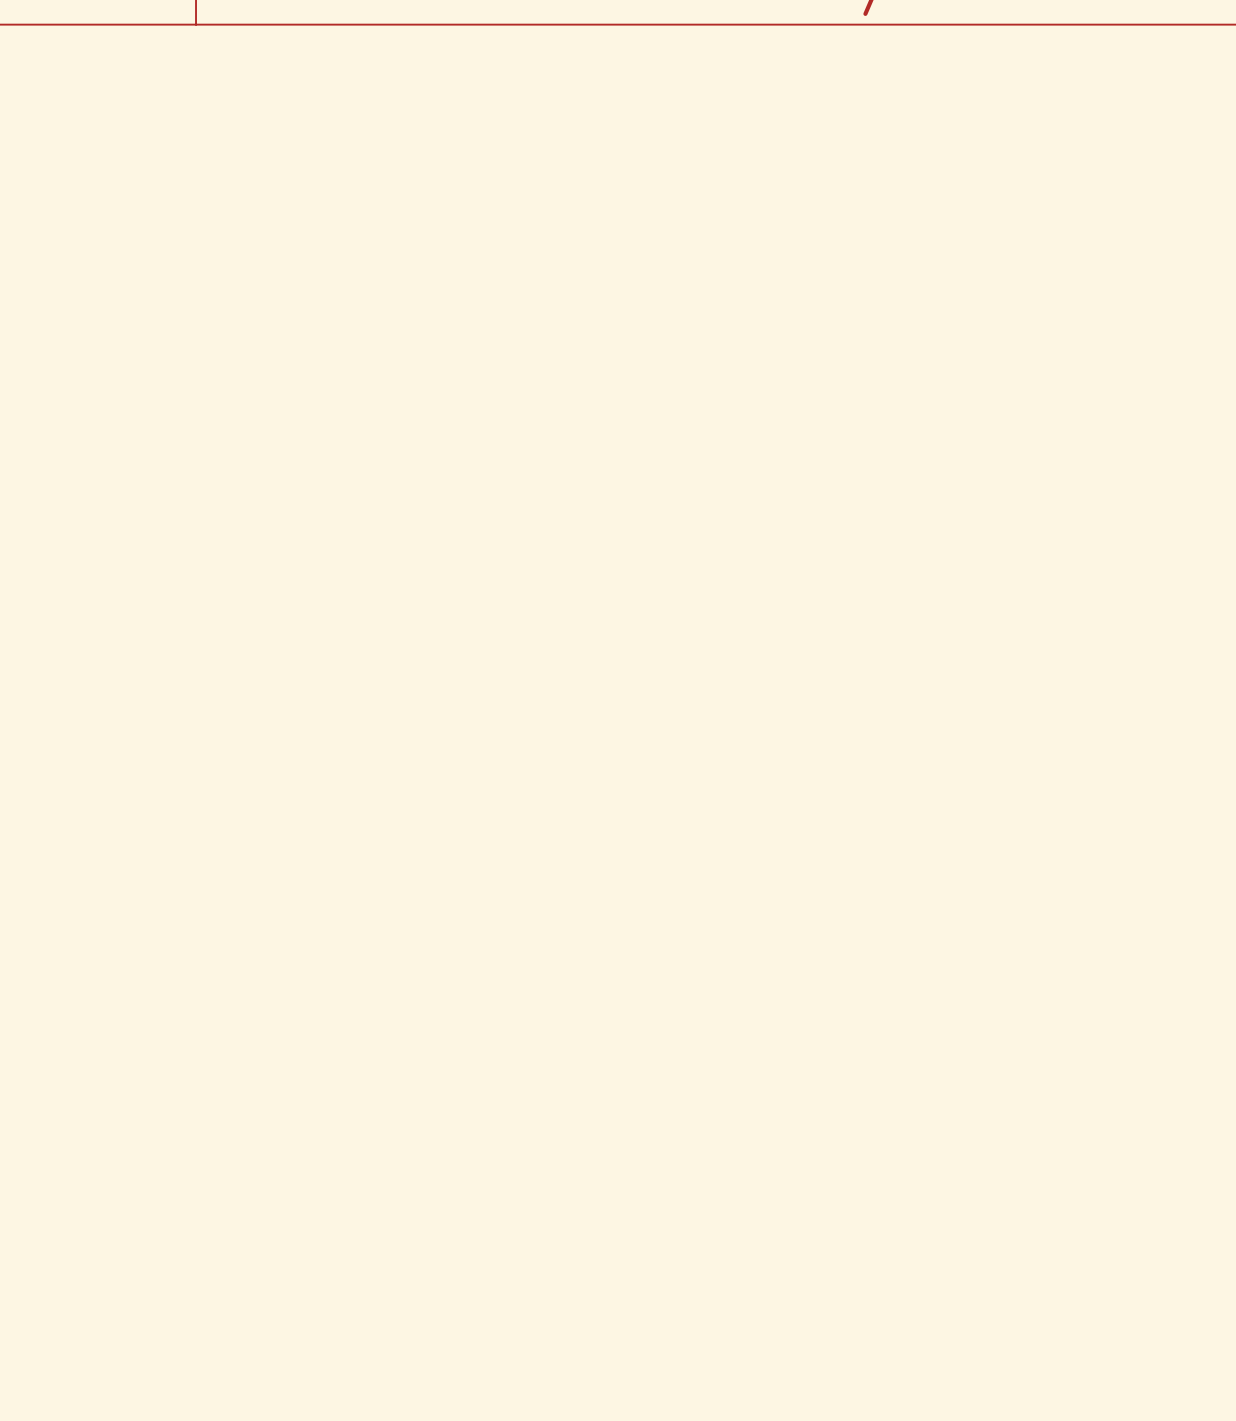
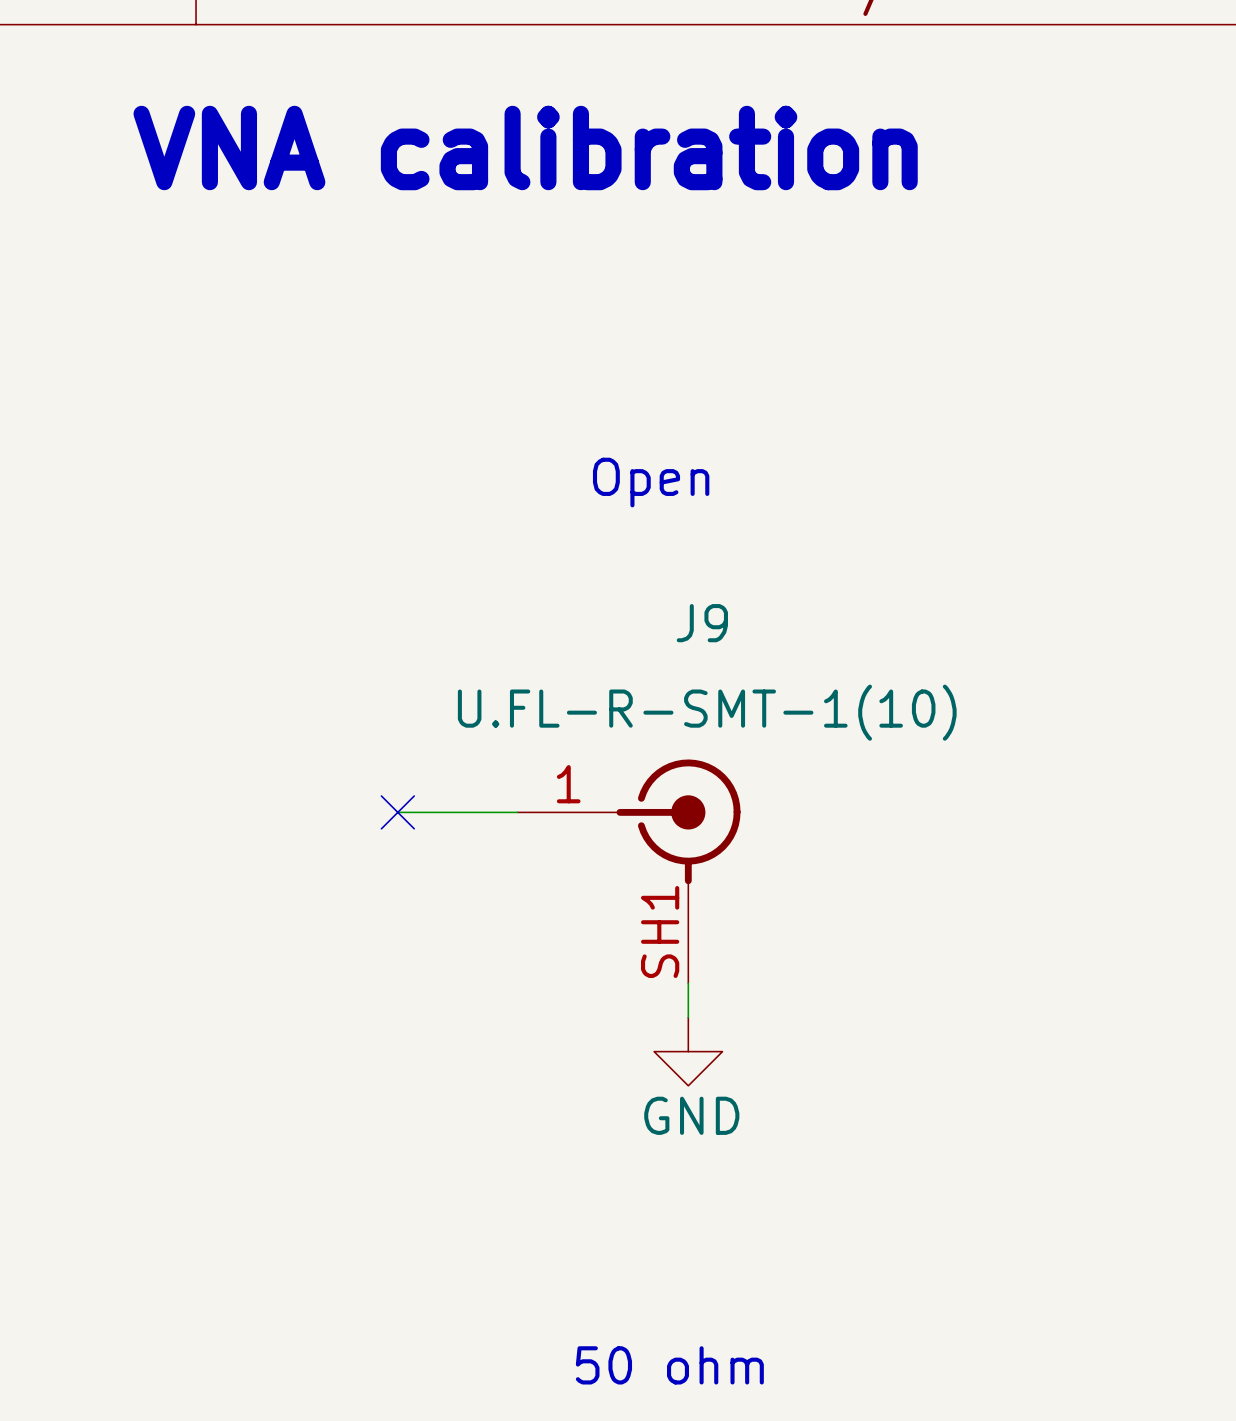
text: none -> VNA calibration (525, 147)
text: none -> Open (651, 482)
wire: none -> (397, 812) (517, 812)
no-connect mark: none -> (397, 812)
J9: none -> (628, 871)
wire: none -> (688, 983) (688, 1017)
power symbol: none -> GND (688, 1051)
text: none -> 50 ohm (669, 1365)

